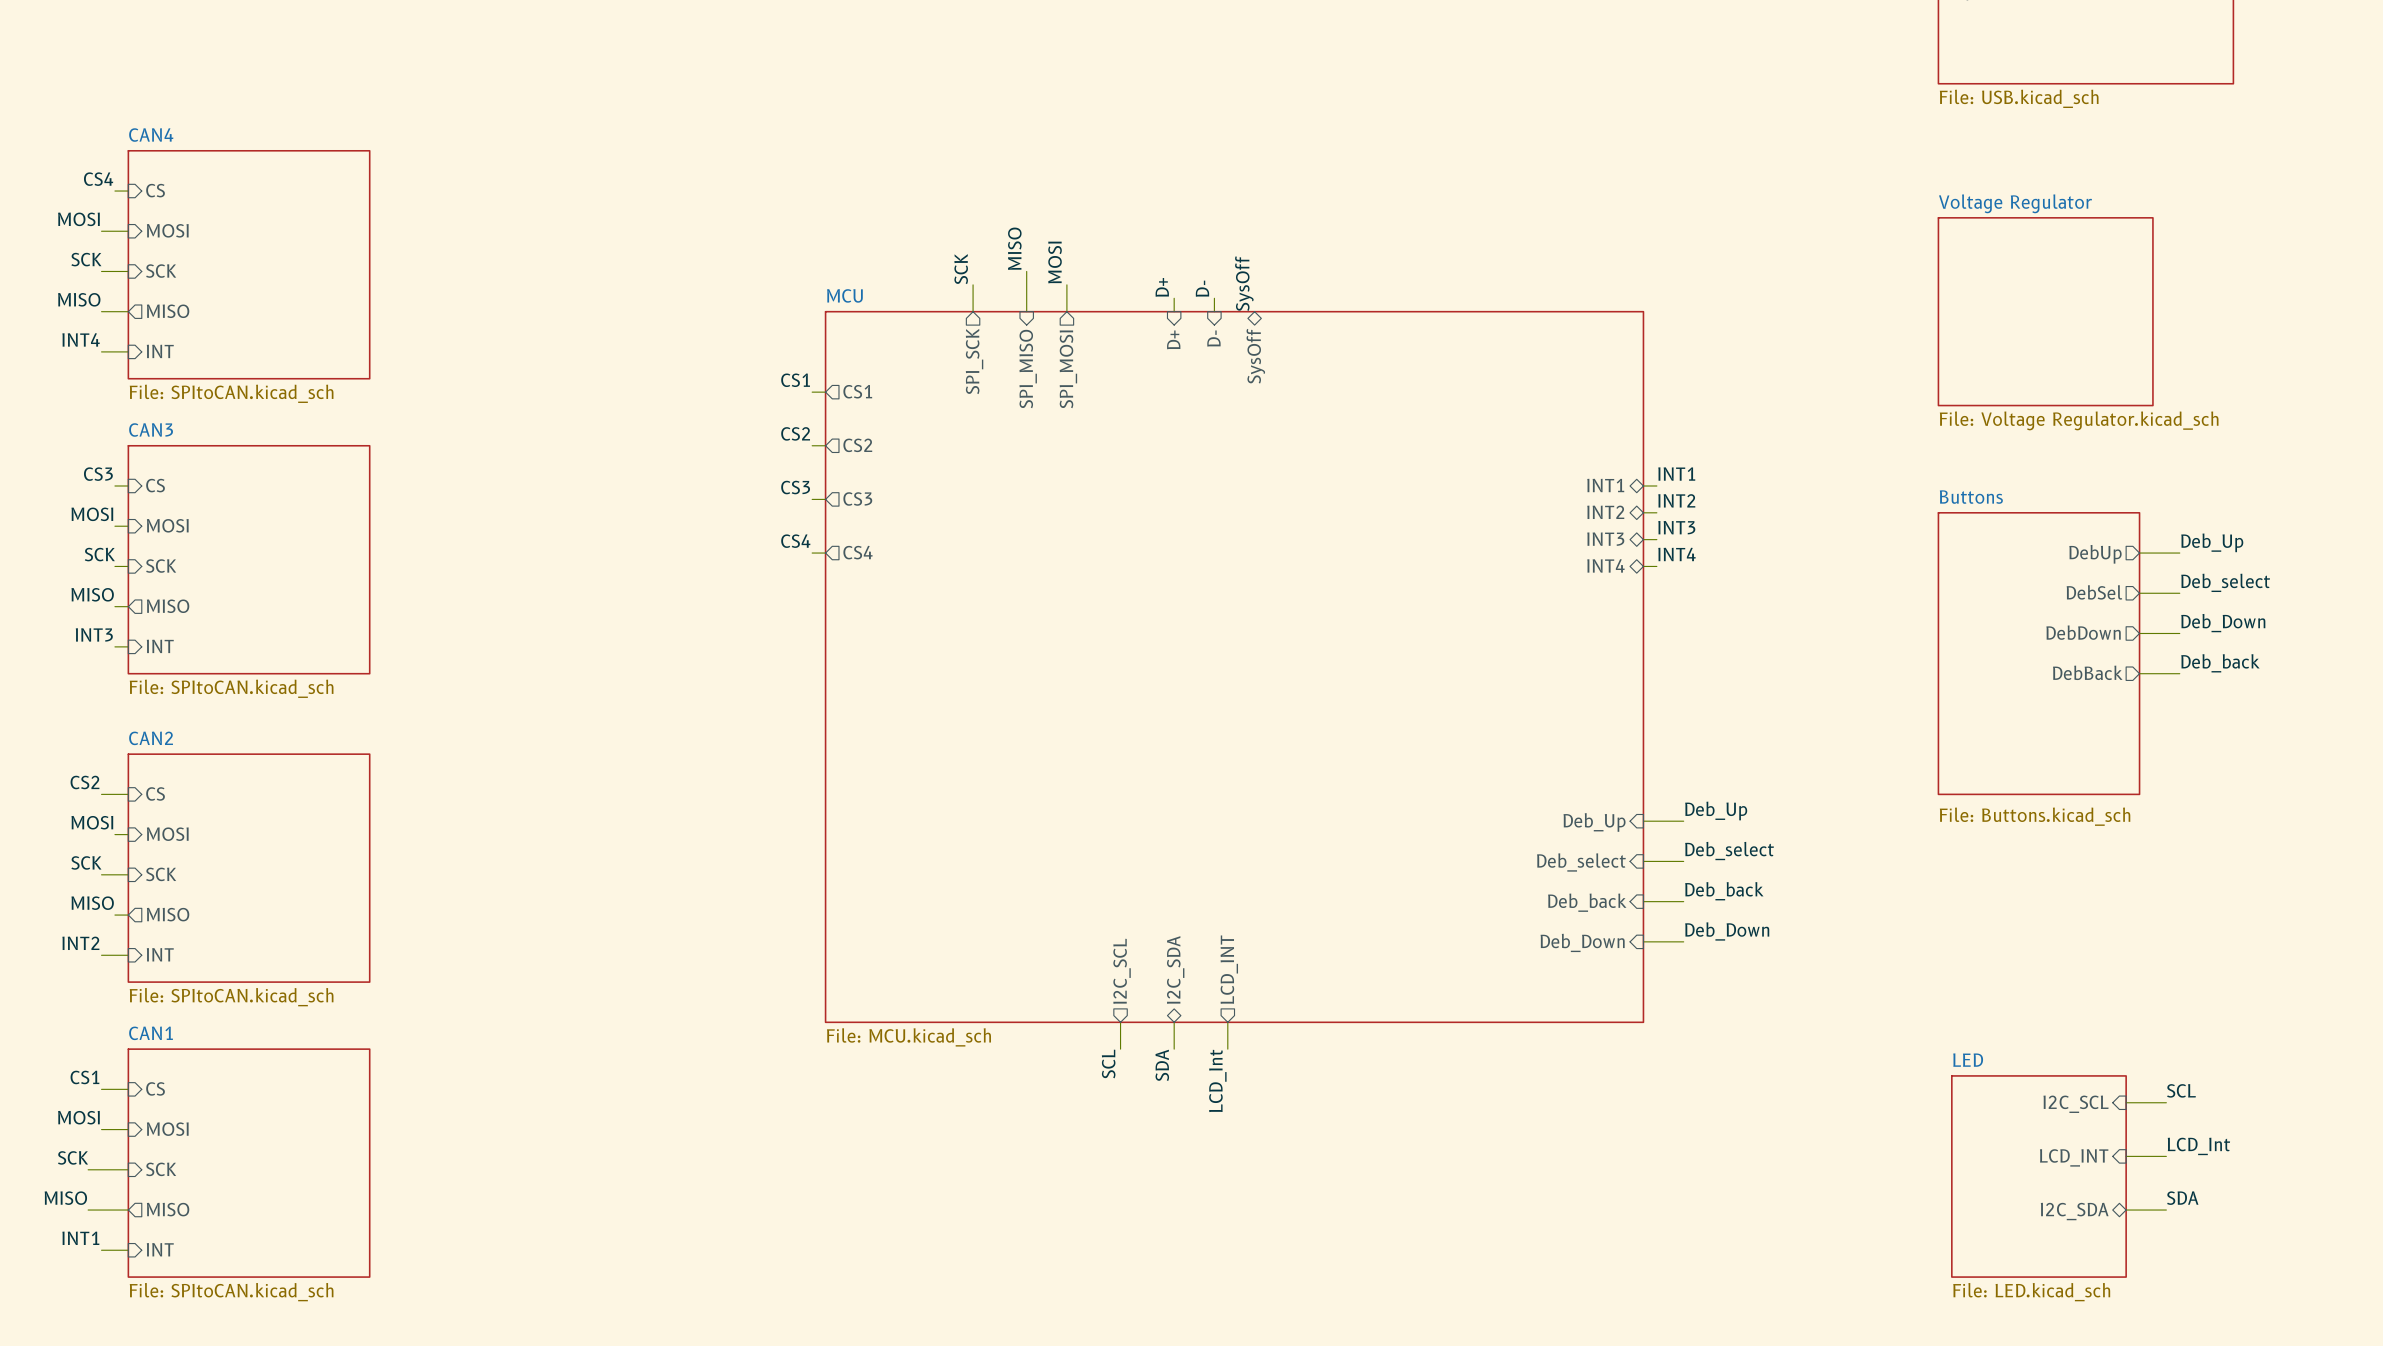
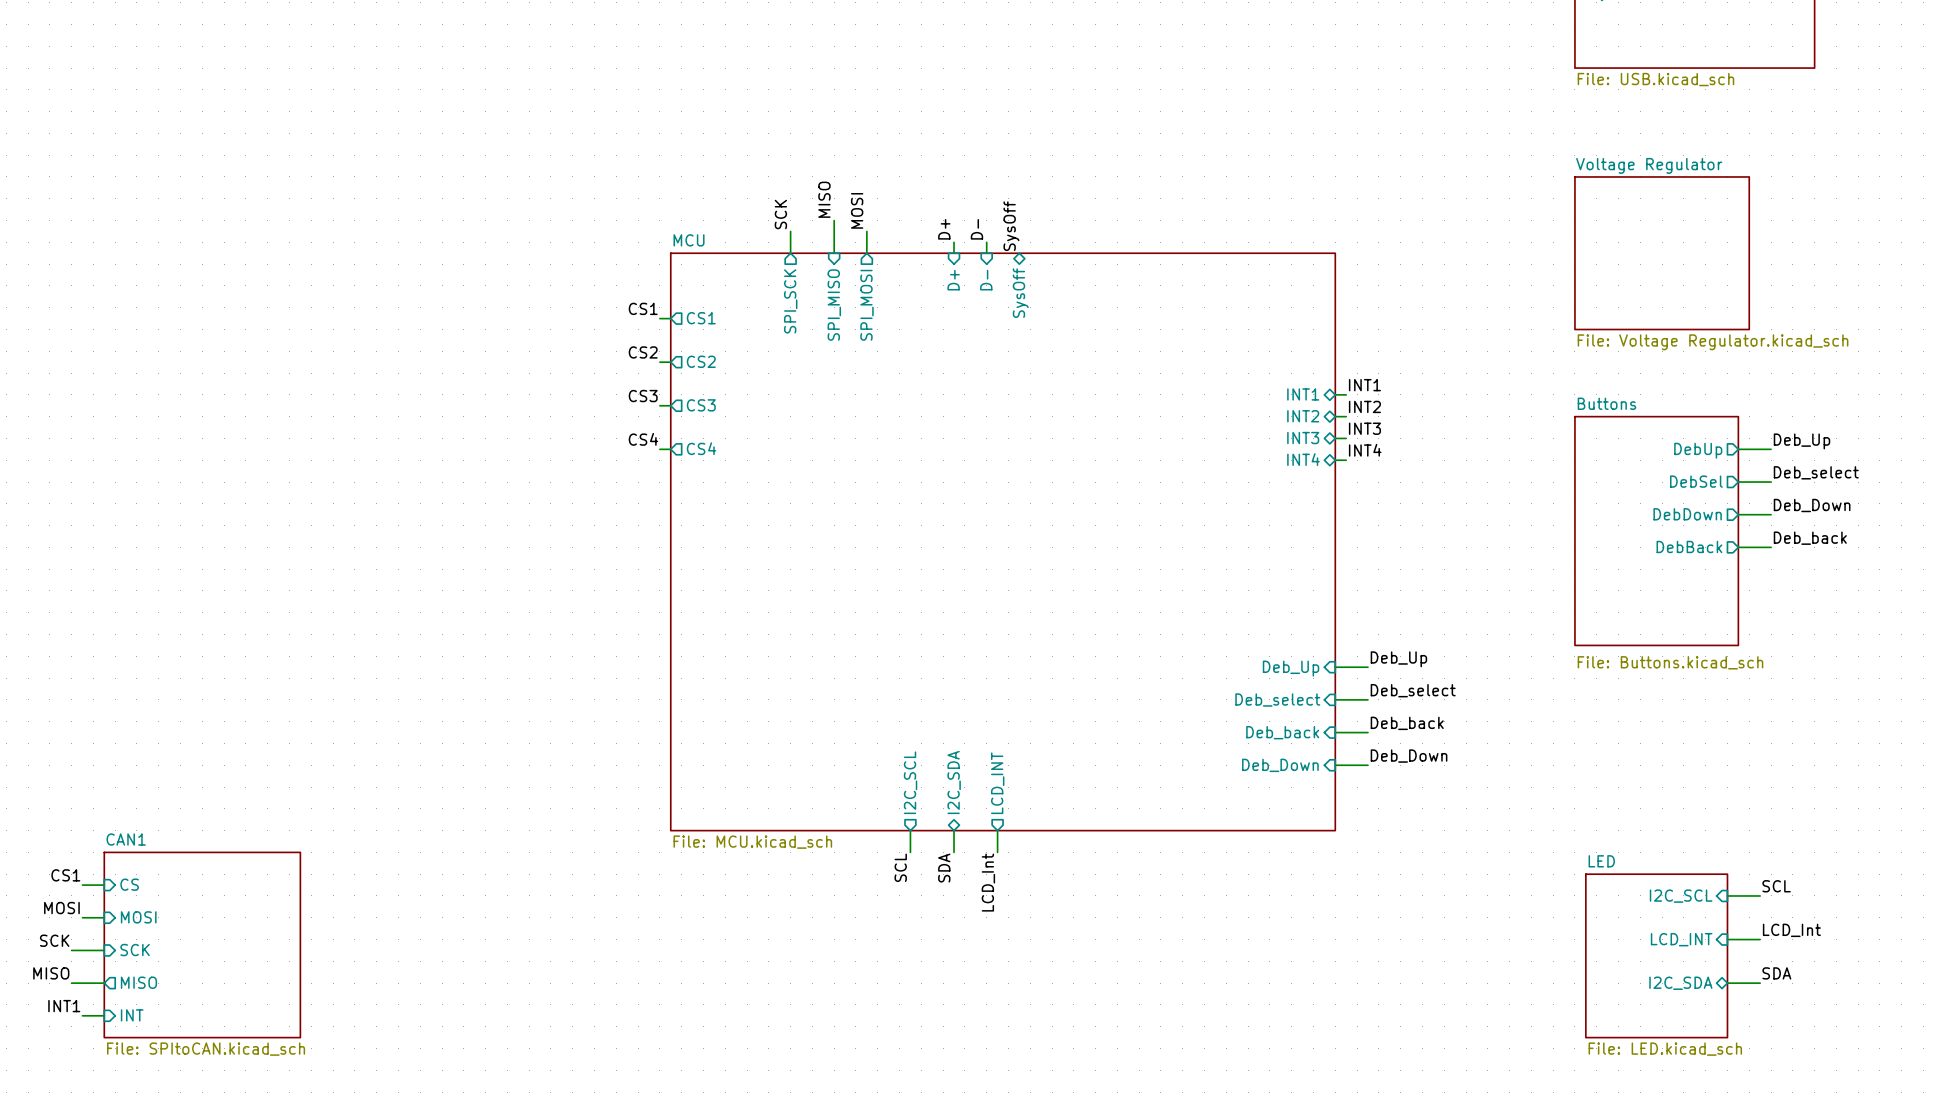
label: CS4 (98, 179) -> none
sheet pin: CS (155, 190) -> none
wire: (114, 191) (128, 191) -> none
label: MOSI (78, 219) -> none
sheet pin: MOSI (167, 230) -> none
wire: (101, 231) (128, 231) -> none
label: SCK (86, 259) -> none
sheet CAN4: File: SPItoCAN.kicad_sch (249, 264) -> none
wire: (101, 271) (128, 271) -> none
sheet pin: SCK (161, 271) -> none
label: MISO (79, 299) -> none
wire: (101, 311) (128, 311) -> none
sheet pin: MISO (168, 311) -> none
label: INT4 (81, 339) -> none
wire: (101, 351) (128, 351) -> none
sheet pin: INT (160, 351) -> none
label: CS3 (98, 474) -> none
wire: (114, 485) (128, 485) -> none
sheet pin: CS (155, 485) -> none
label: MOSI (92, 514) -> none
sheet pin: MOSI (167, 525) -> none
wire: (114, 526) (128, 526) -> none
label: SCK (99, 554) -> none
sheet CAN3: File: SPItoCAN.kicad_sch (249, 559) -> none
wire: (114, 566) (128, 566) -> none
sheet pin: SCK (161, 566) -> none
label: MISO (92, 594) -> none
wire: (114, 606) (128, 606) -> none
sheet pin: MISO (168, 606) -> none
label: INT3 (94, 634) -> none
wire: (114, 646) (128, 646) -> none
sheet pin: INT (160, 646) -> none
label: CS2 (84, 782) -> none
sheet pin: CS (155, 793) -> none
wire: (101, 794) (128, 794) -> none
label: MOSI (92, 822) -> none
wire: (114, 834) (128, 834) -> none
sheet pin: MOSI (167, 834) -> none
label: SCK (86, 862) -> none
sheet CAN2: File: SPItoCAN.kicad_sch (249, 868) -> none
wire: (101, 874) (128, 874) -> none
sheet pin: SCK (161, 874) -> none
label: MISO (92, 903) -> none
sheet pin: MISO (168, 914) -> none
wire: (114, 915) (128, 915) -> none
label: INT2 (80, 943) -> none
sheet pin: INT (160, 954) -> none
wire: (101, 955) (128, 955) -> none

